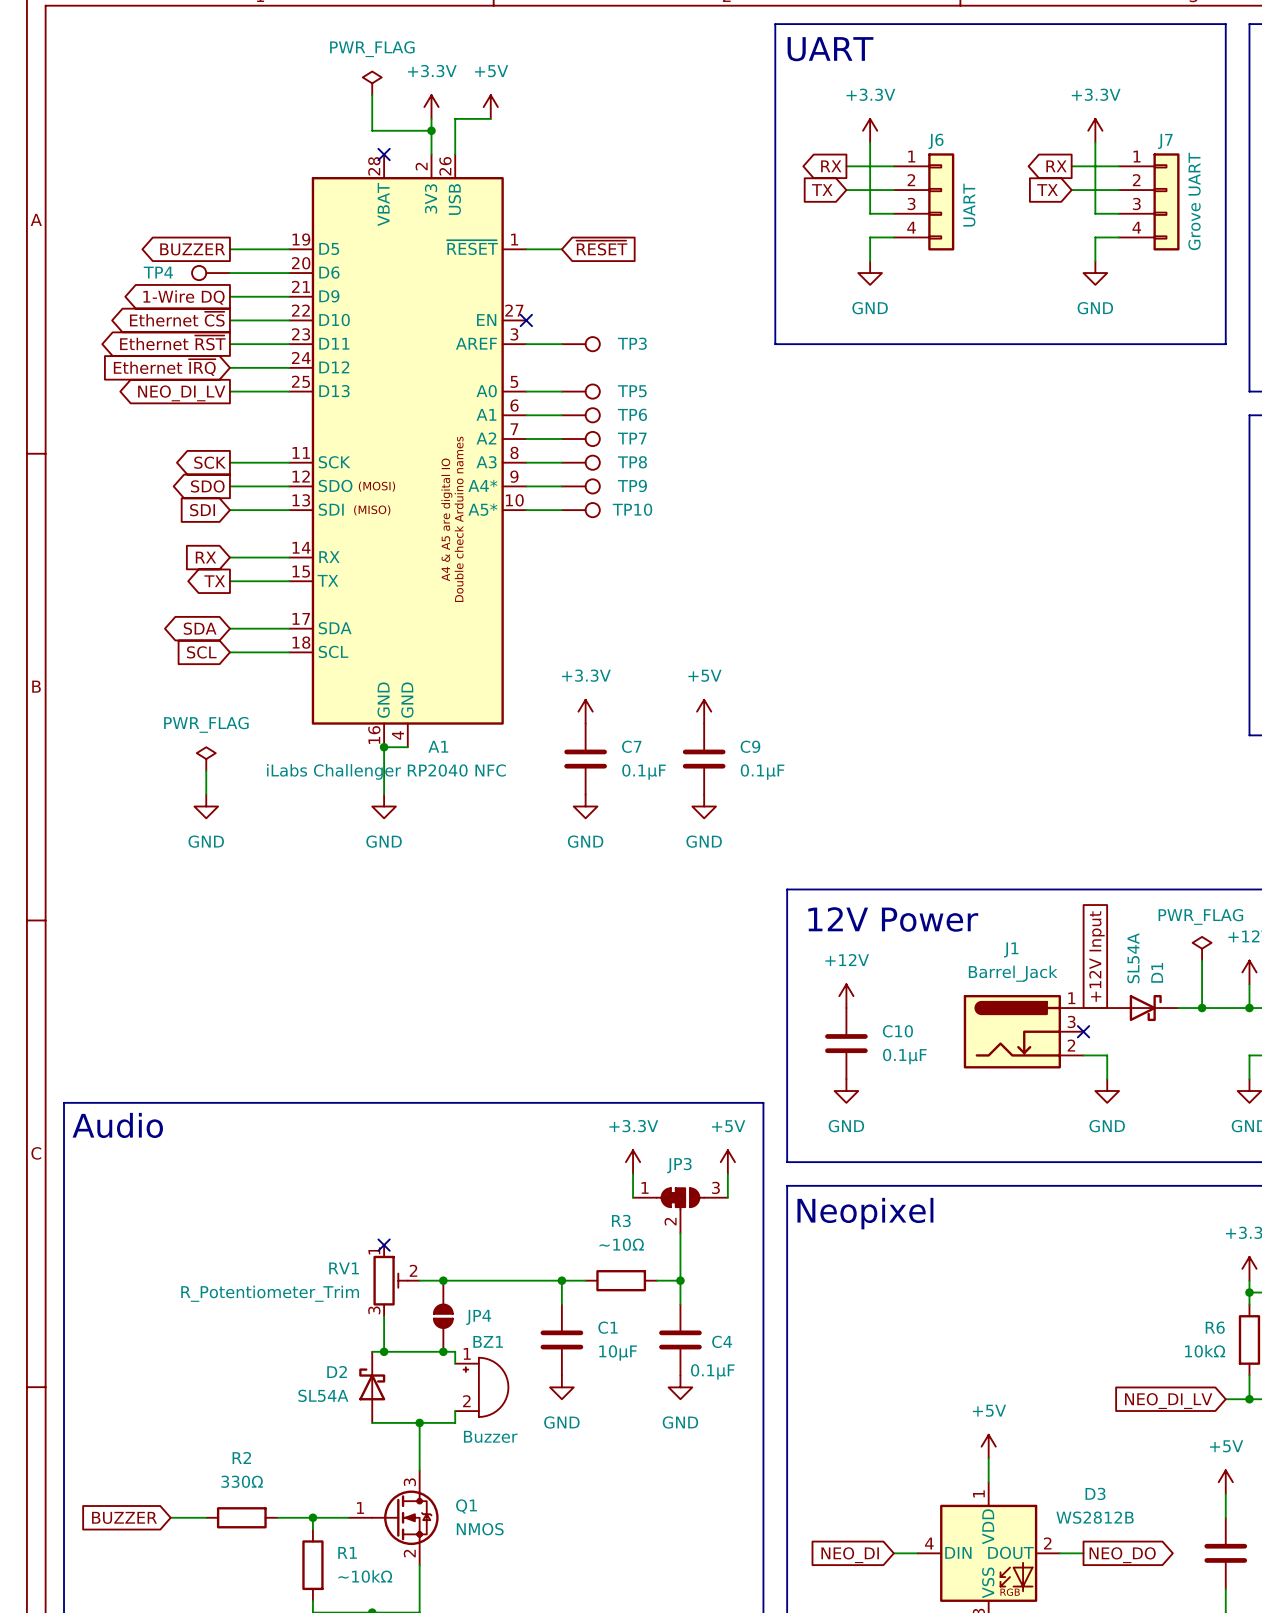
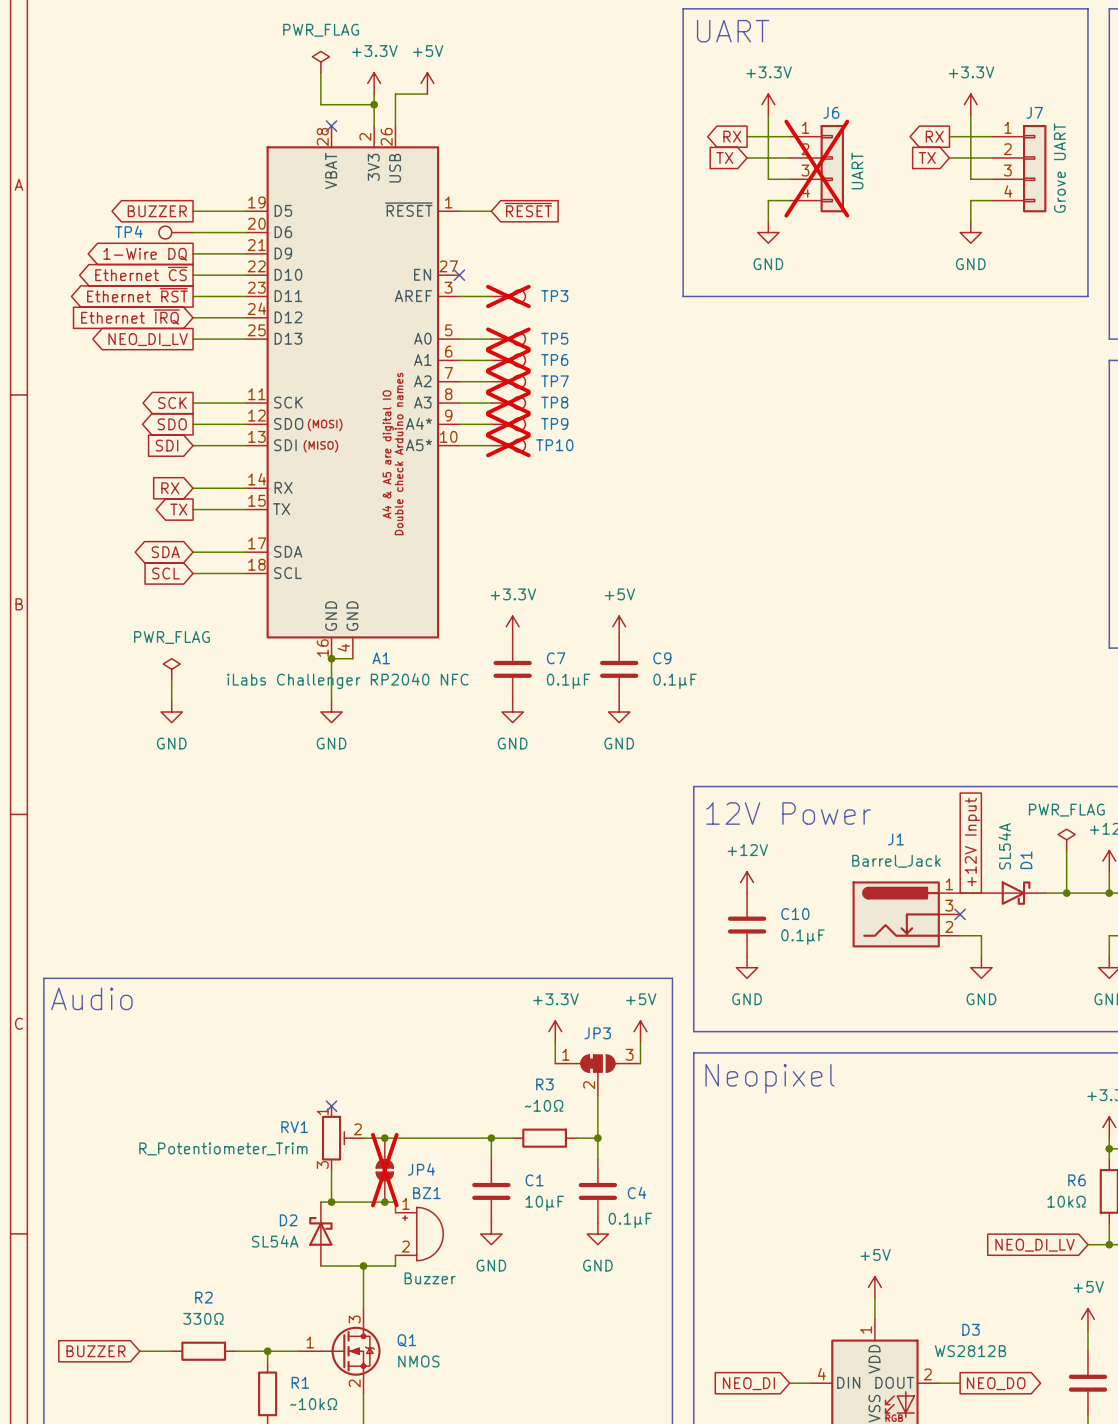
J6 do-not-place cross: none -> (816, 168)
TP3 do-not-place cross: none -> (508, 296)
TP5 do-not-place cross: none -> (508, 339)
TP6 do-not-place cross: none -> (508, 360)
TP7 do-not-place cross: none -> (508, 381)
TP8 do-not-place cross: none -> (508, 403)
TP9 do-not-place cross: none -> (508, 424)
TP10 do-not-place cross: none -> (508, 445)
JP4 do-not-place cross: none -> (384, 1170)

